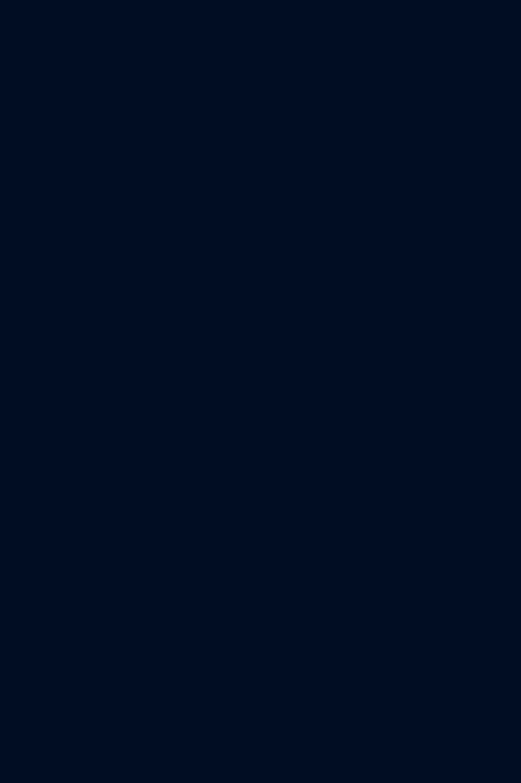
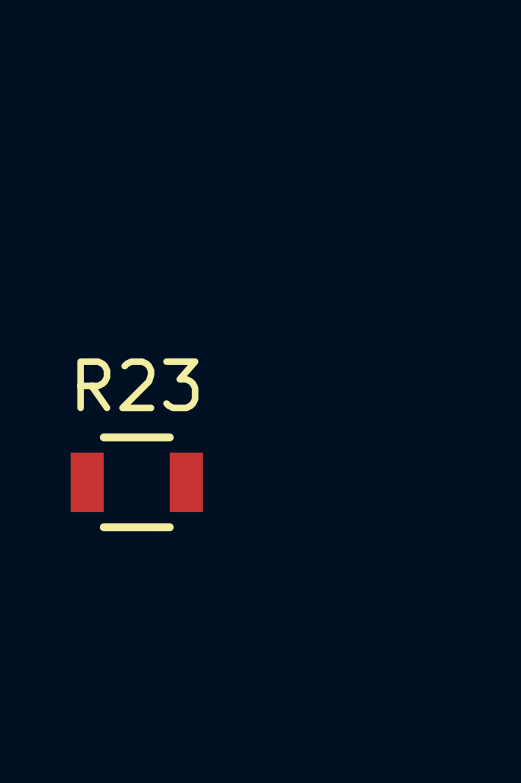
R23: none -> (136, 482)

